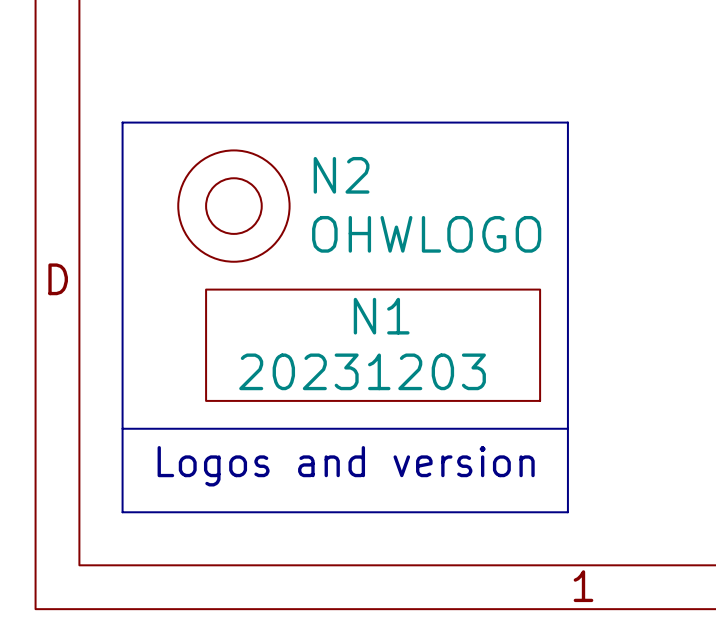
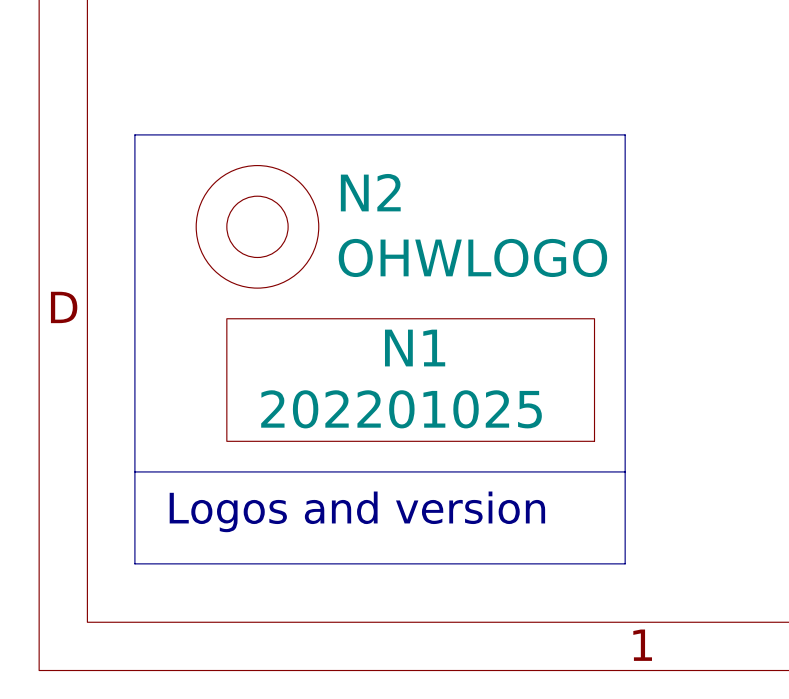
N1 value: 20231203 (362, 371) -> 202201025 (401, 409)

